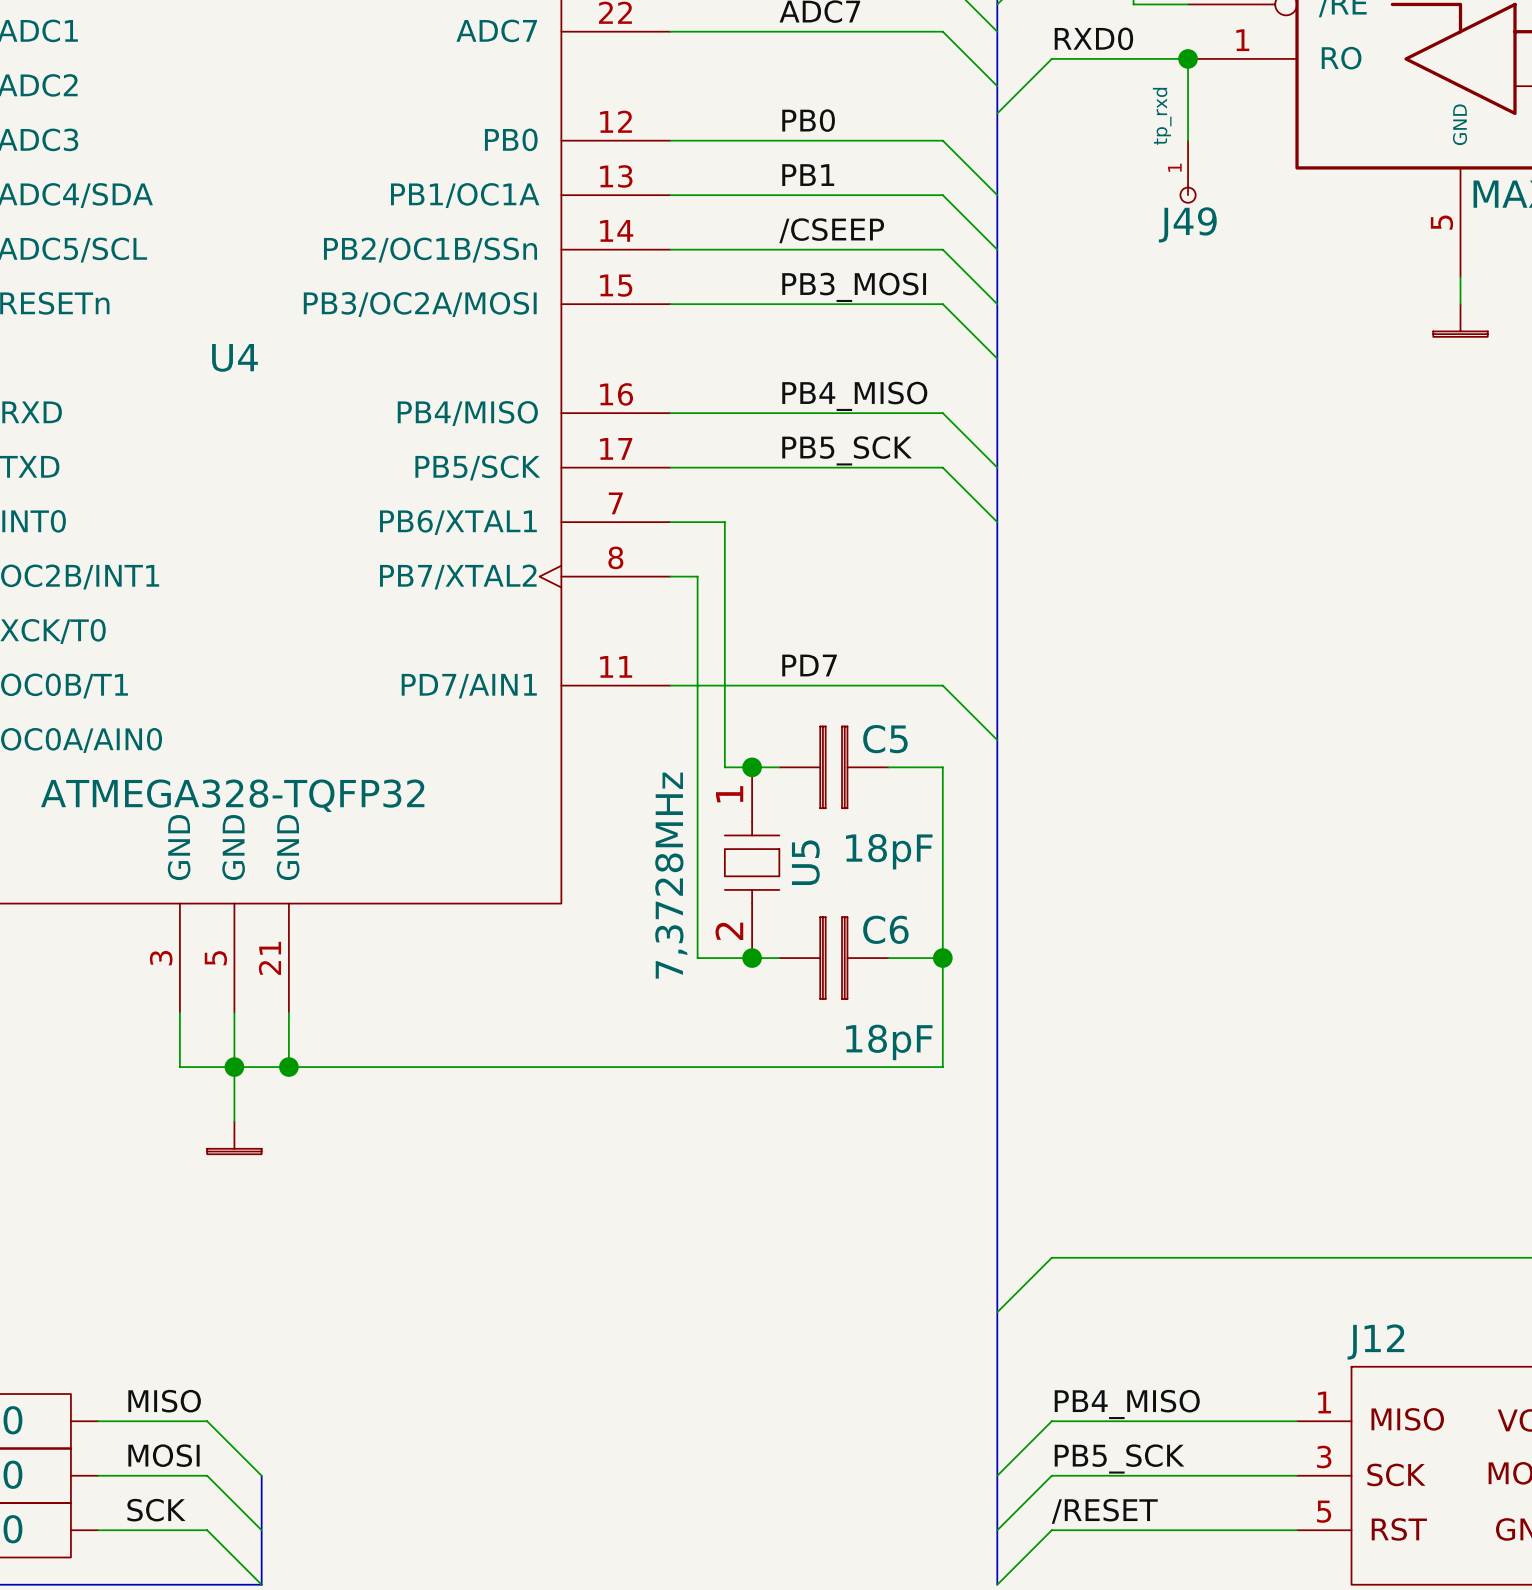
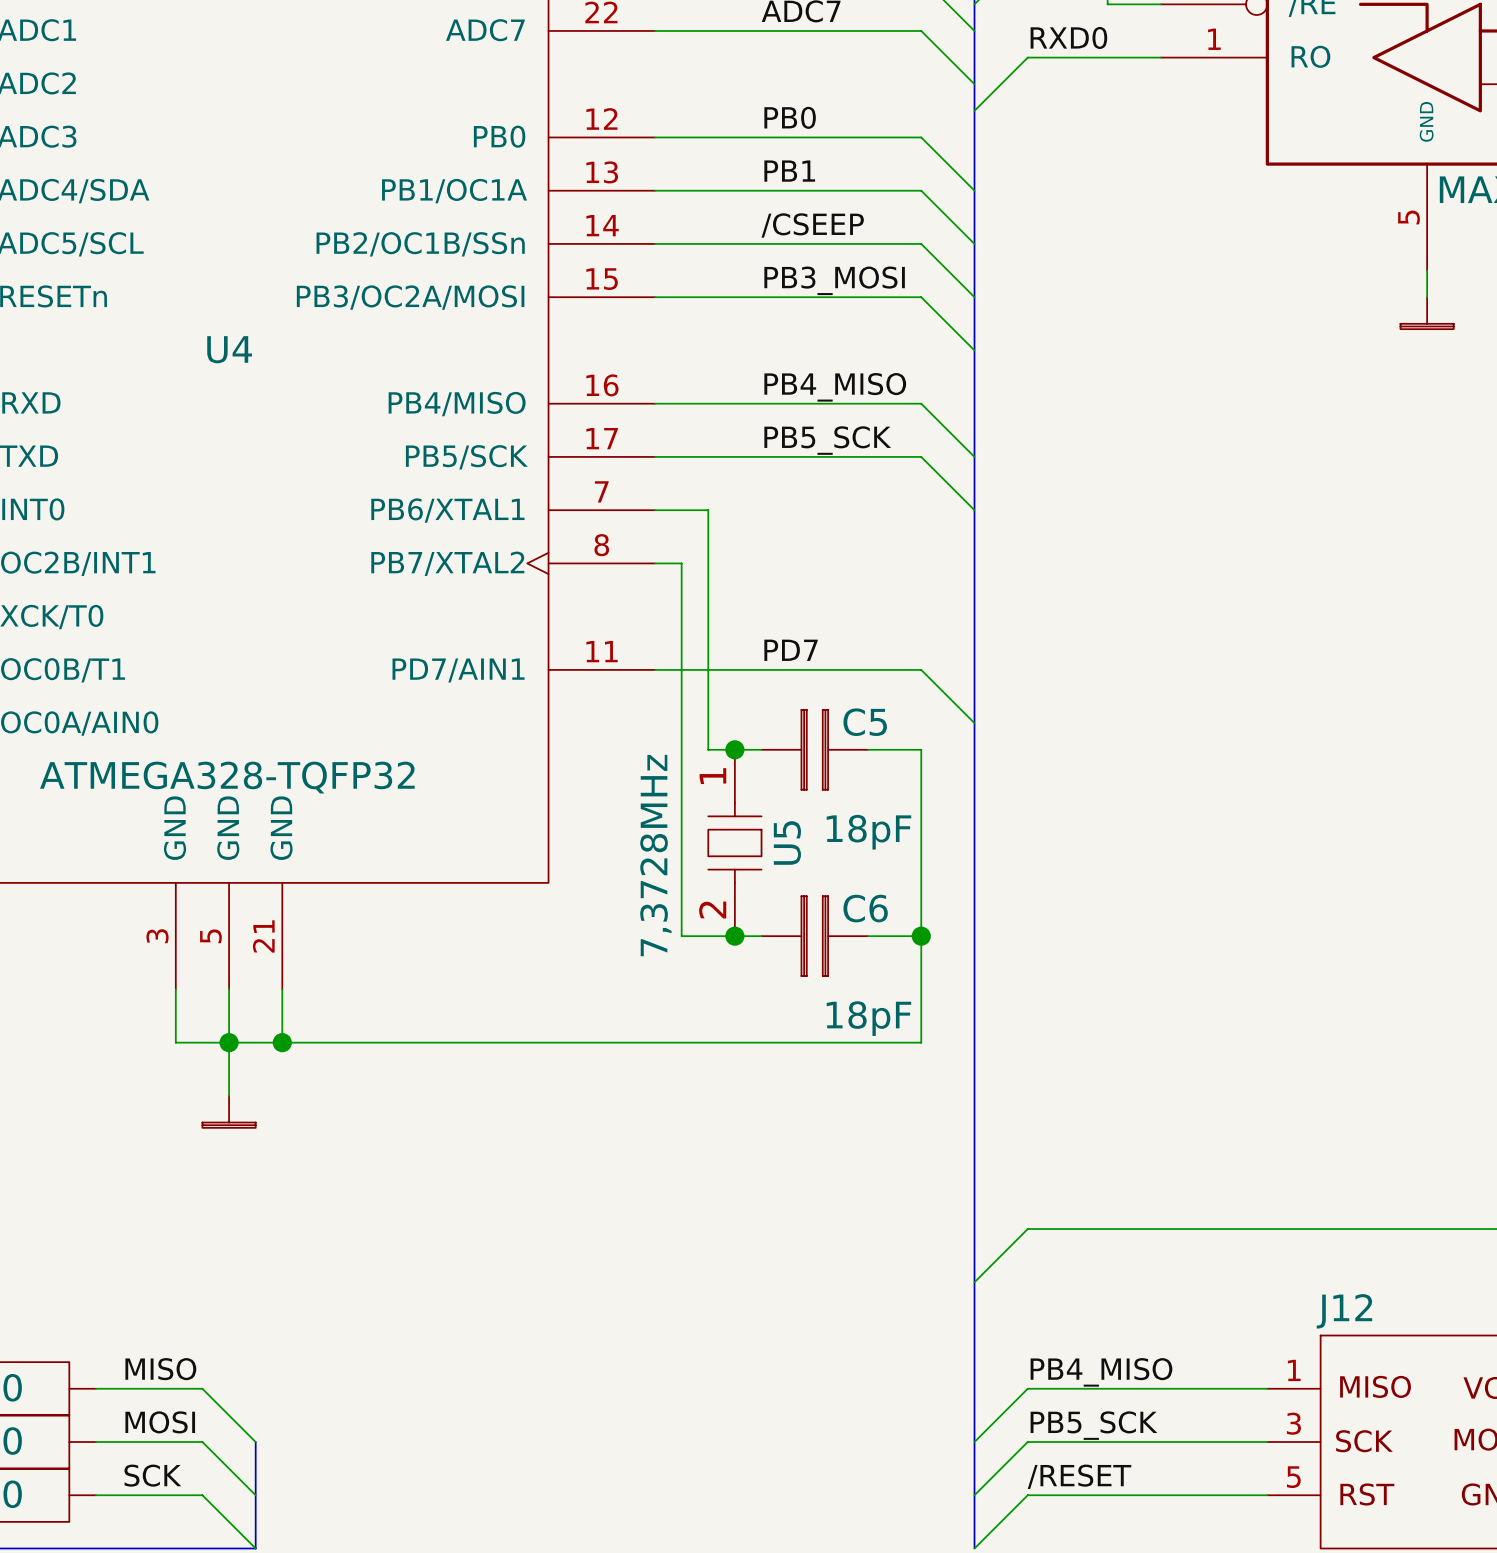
wire: (1188, 58) (1188, 140) -> none
junction: (1188, 58) -> none
J49: tp_rxd (1188, 171) -> none

